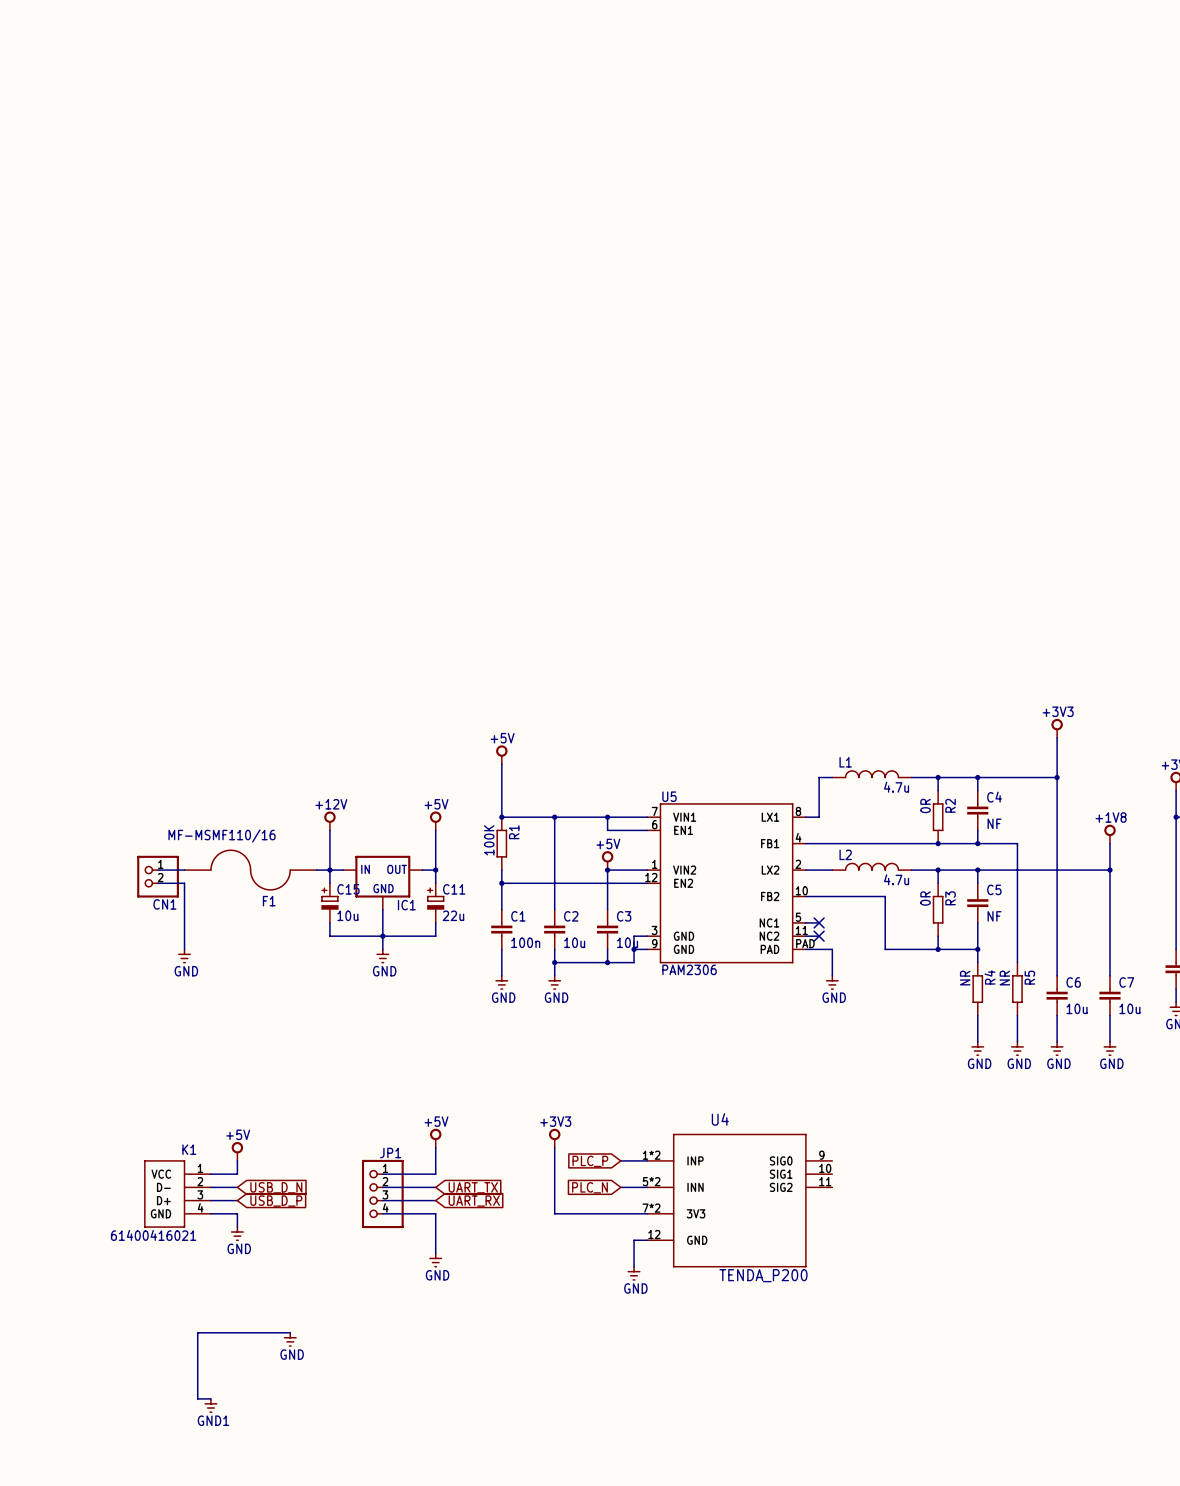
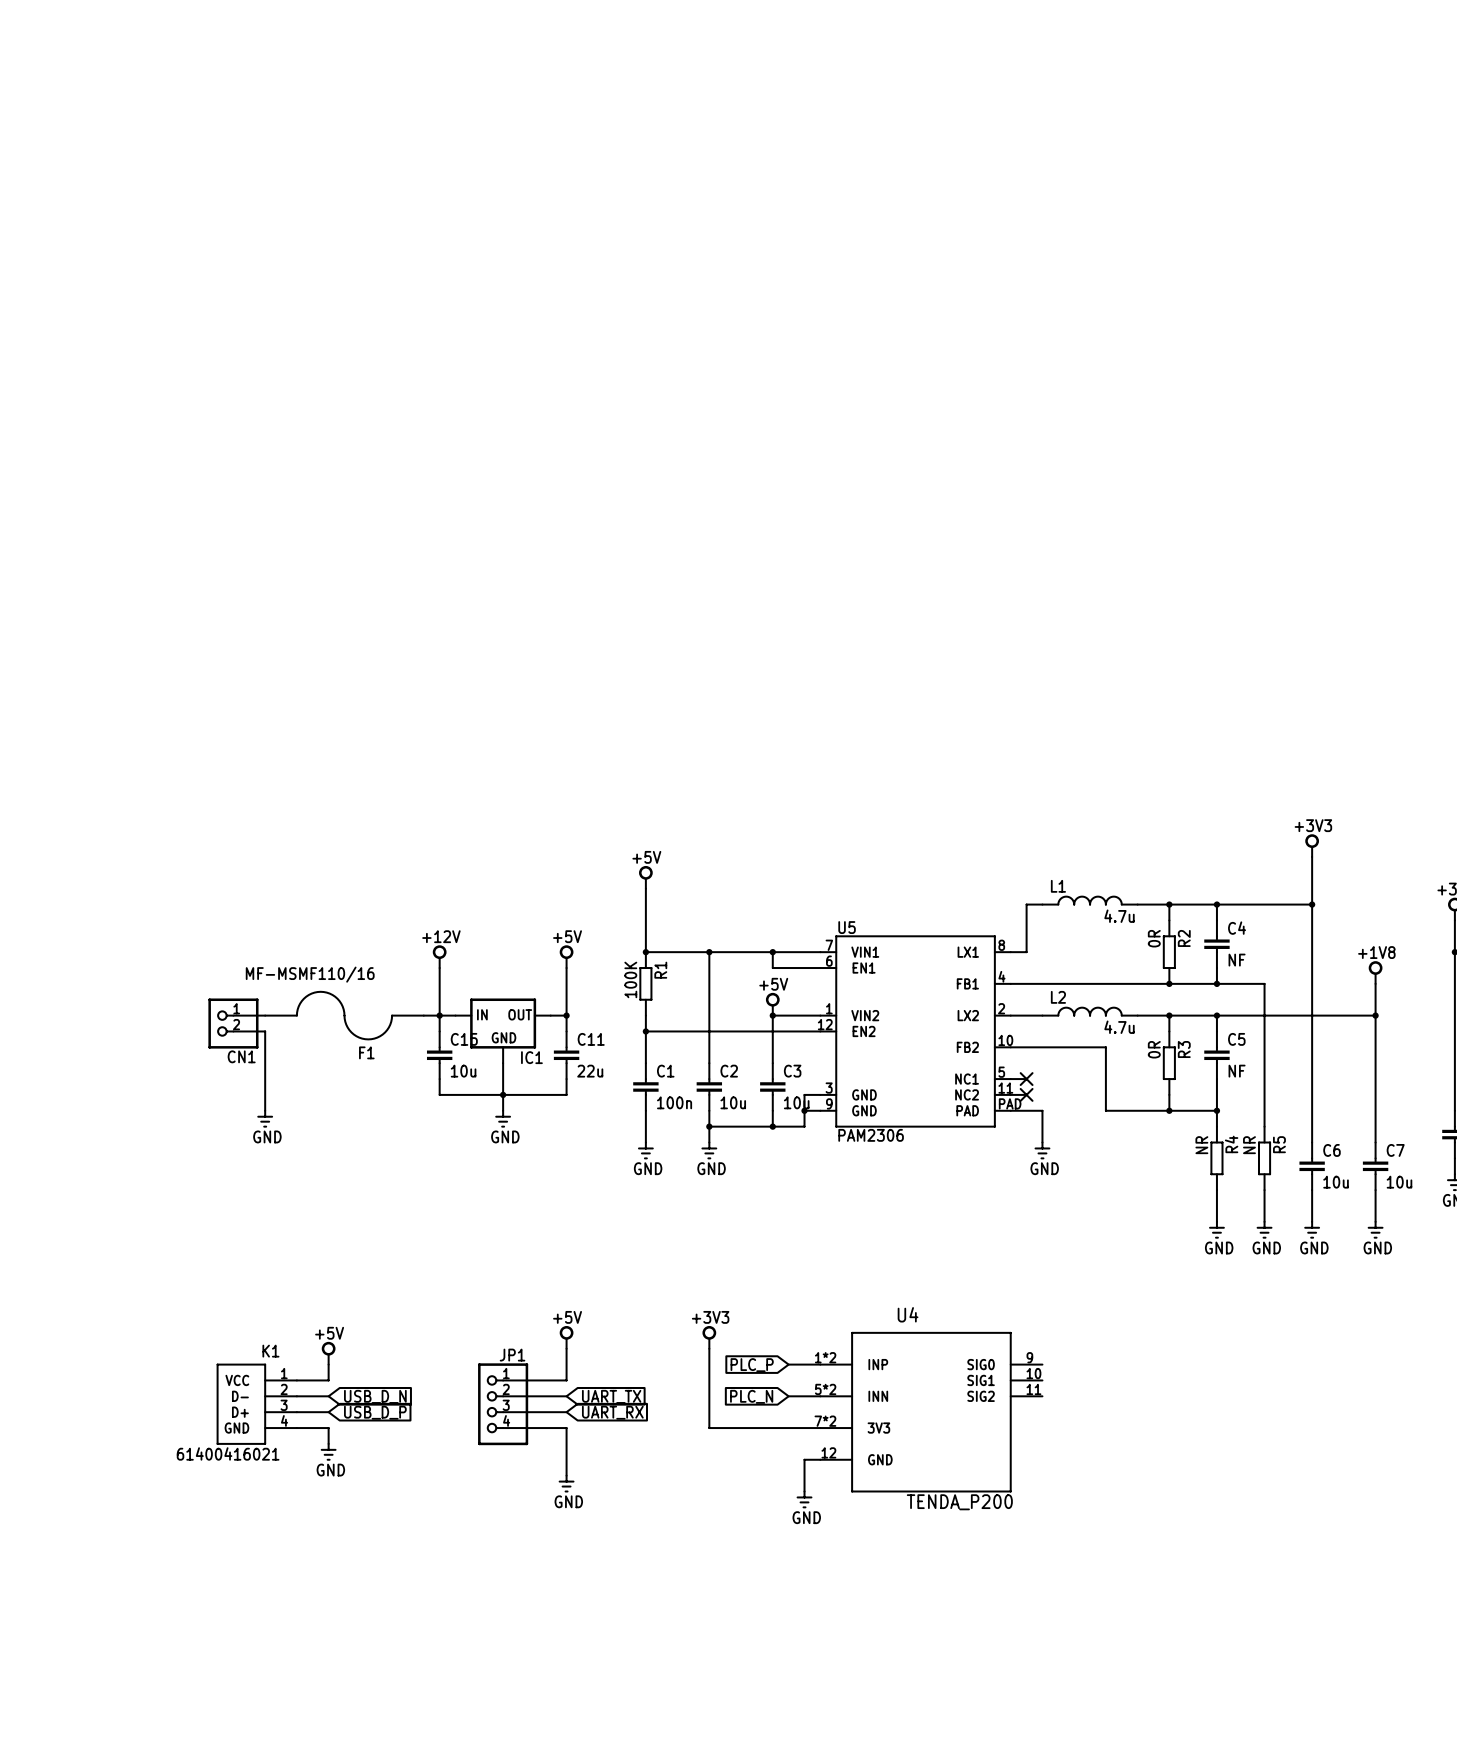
C15 symbol: [321, 883, 339, 923] -> [426, 1031, 453, 1080]
C11 symbol: [427, 883, 445, 923] -> [553, 1031, 580, 1080]
wire: (290, 1332) (197, 1332) (197, 1398) (210, 1398) -> none
power symbol: GND (290, 1339) -> none
power symbol: GND1 (210, 1405) -> none

